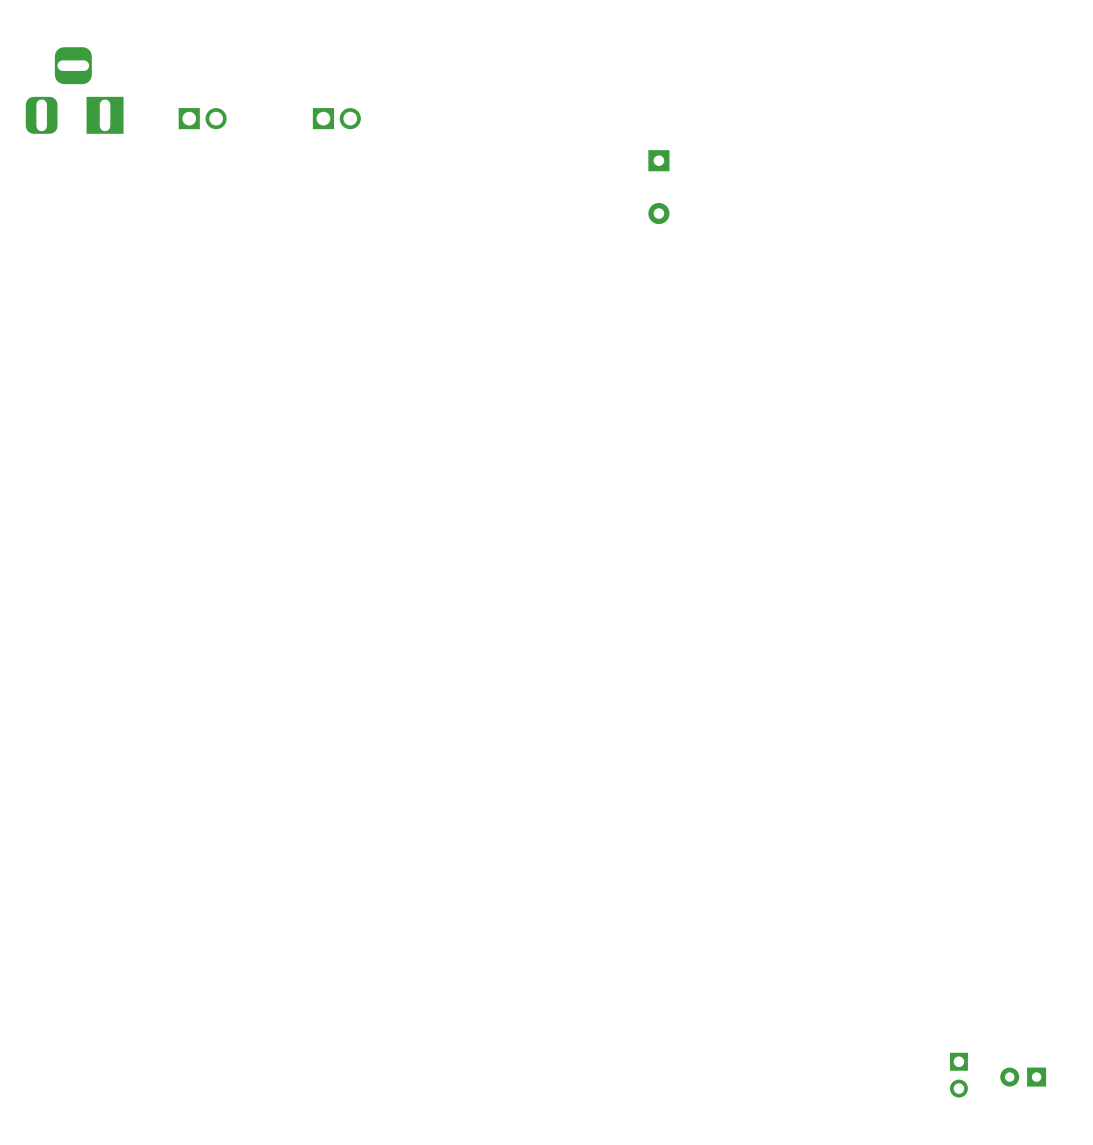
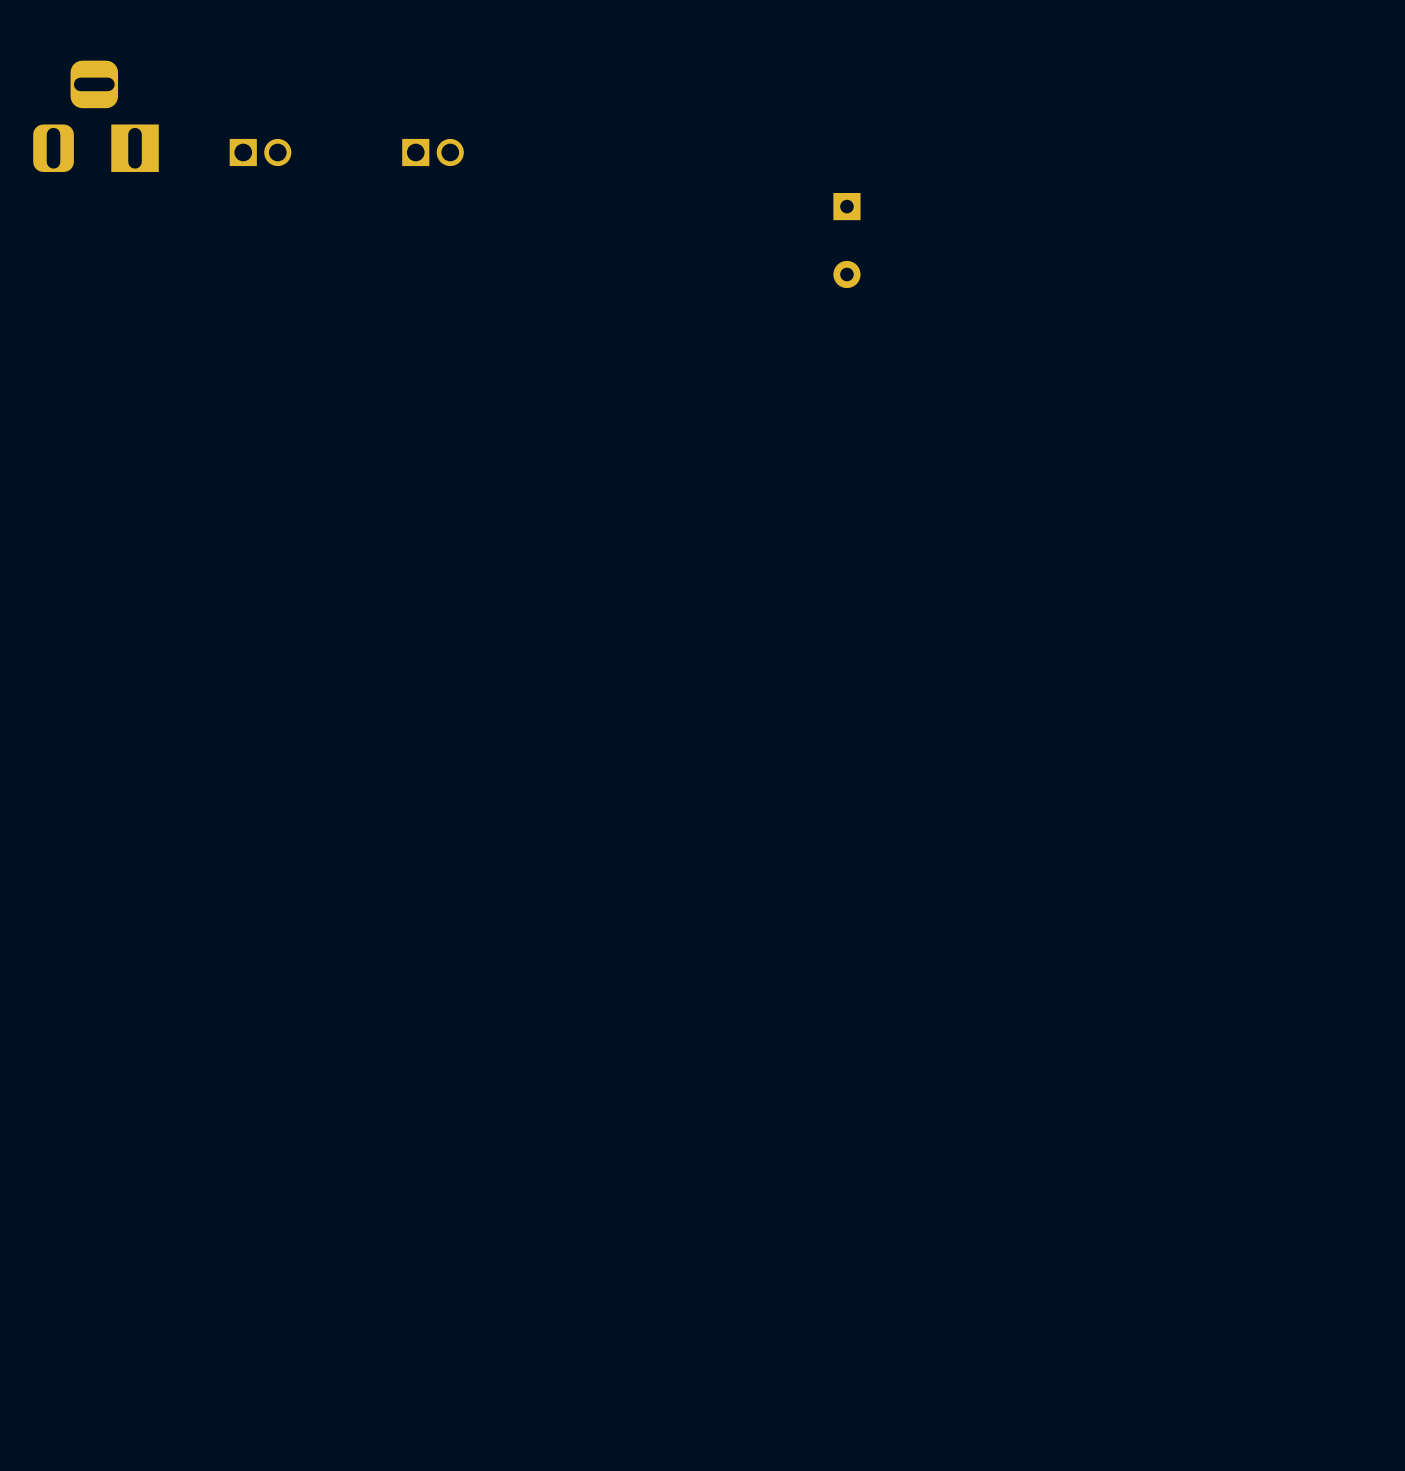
part: (958, 1075) -> none
part: (1023, 1077) -> none

